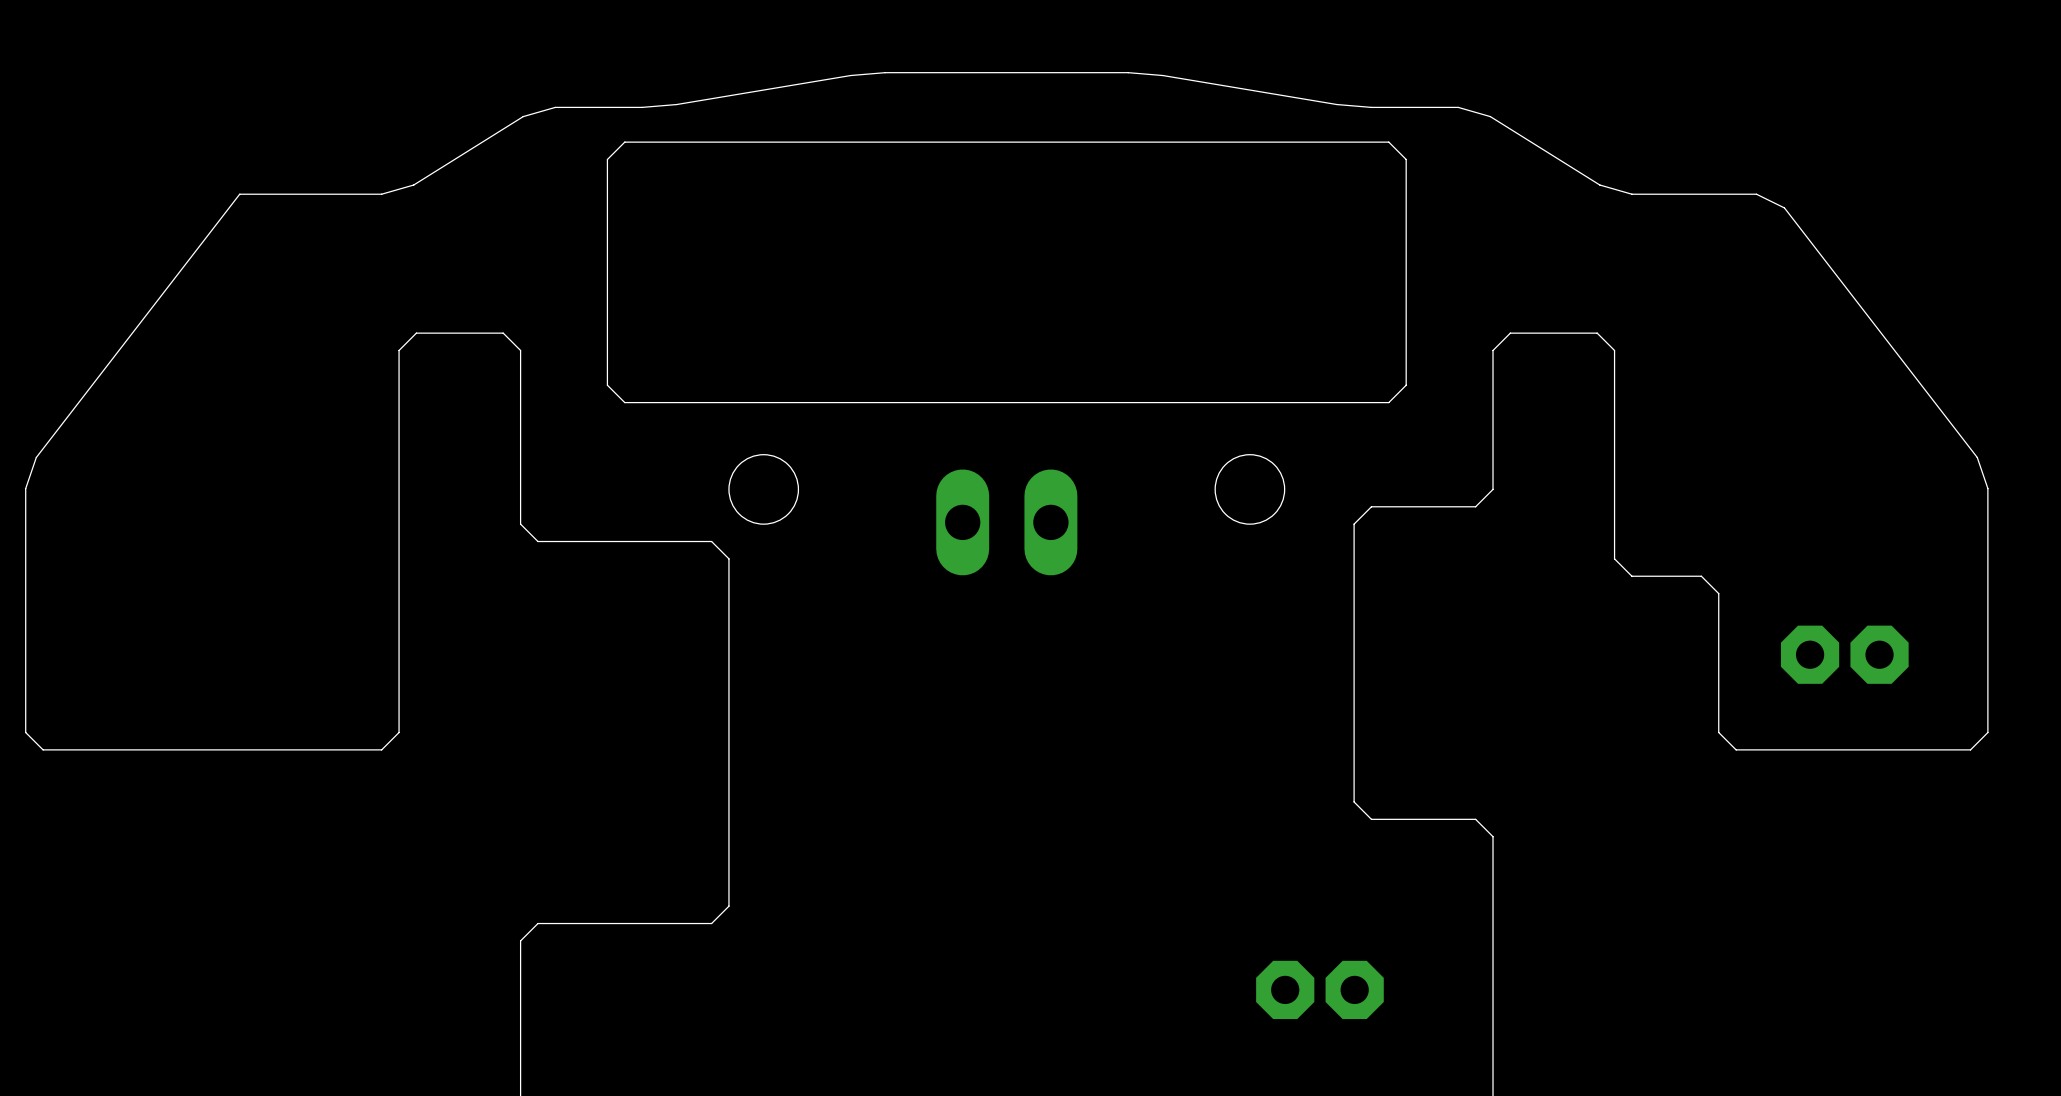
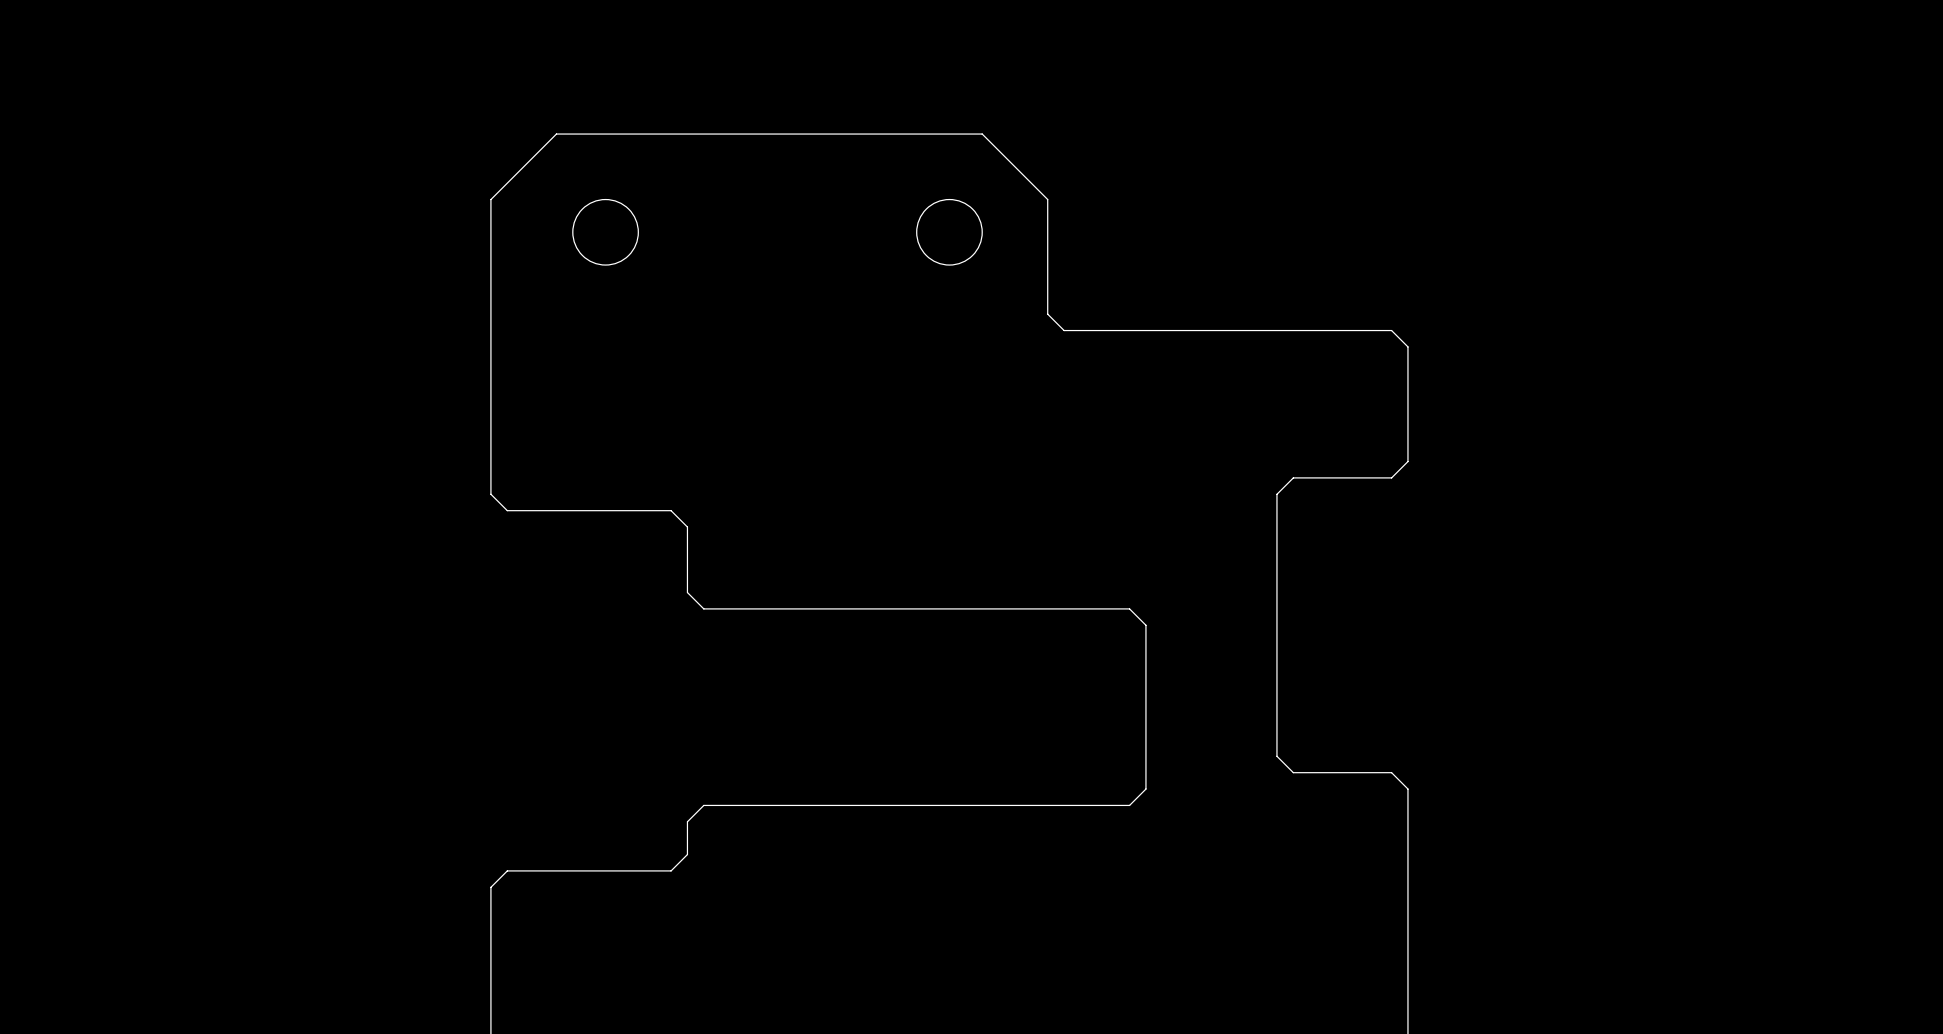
board edge: (1041, 142) (1388, 142) (1406, 159) (1406, 385) (1388, 402) (624, 402) (607, 385) (607, 159) (624, 142) -> (490, 330) (490, 199) (556, 134) (589, 134)
round board edge: none -> [572, 199, 639, 266]
round board edge: none -> [916, 199, 983, 266]
board edge: (520, 350) (503, 333) (416, 333) (399, 350) (399, 732) (381, 749) (43, 749) (25, 732) (25, 488) (36, 457) (239, 194) (381, 194) (413, 185) (523, 116) (555, 107) (642, 107) (676, 104) (850, 75) (885, 72) (1128, 72) (1162, 75) (1336, 104) (1371, 107) (1458, 107) (1490, 116) (1599, 185) (1631, 194) (1756, 194) (1784, 207) (1977, 457) (1987, 488) (1987, 732) (1970, 749) (1736, 749) (1718, 732) (1718, 593) (1701, 576) (1631, 576) (1614, 558) (1614, 350) (1597, 333) (1510, 333) (1493, 350) (1493, 367) -> (982, 134) (1047, 199) (1047, 314) (1064, 330) (1391, 330) (1407, 346)
round board edge: [728, 454, 799, 525] -> none
round board edge: [1215, 454, 1285, 525] -> none
part: (1006, 522) -> none
board edge: (728, 628) (728, 871) -> (687, 592) (703, 608) (1129, 608) (1145, 625) (1145, 789) (1129, 805) (703, 805) (687, 821)
part: (1844, 654) -> none
part: (1319, 989) -> none

